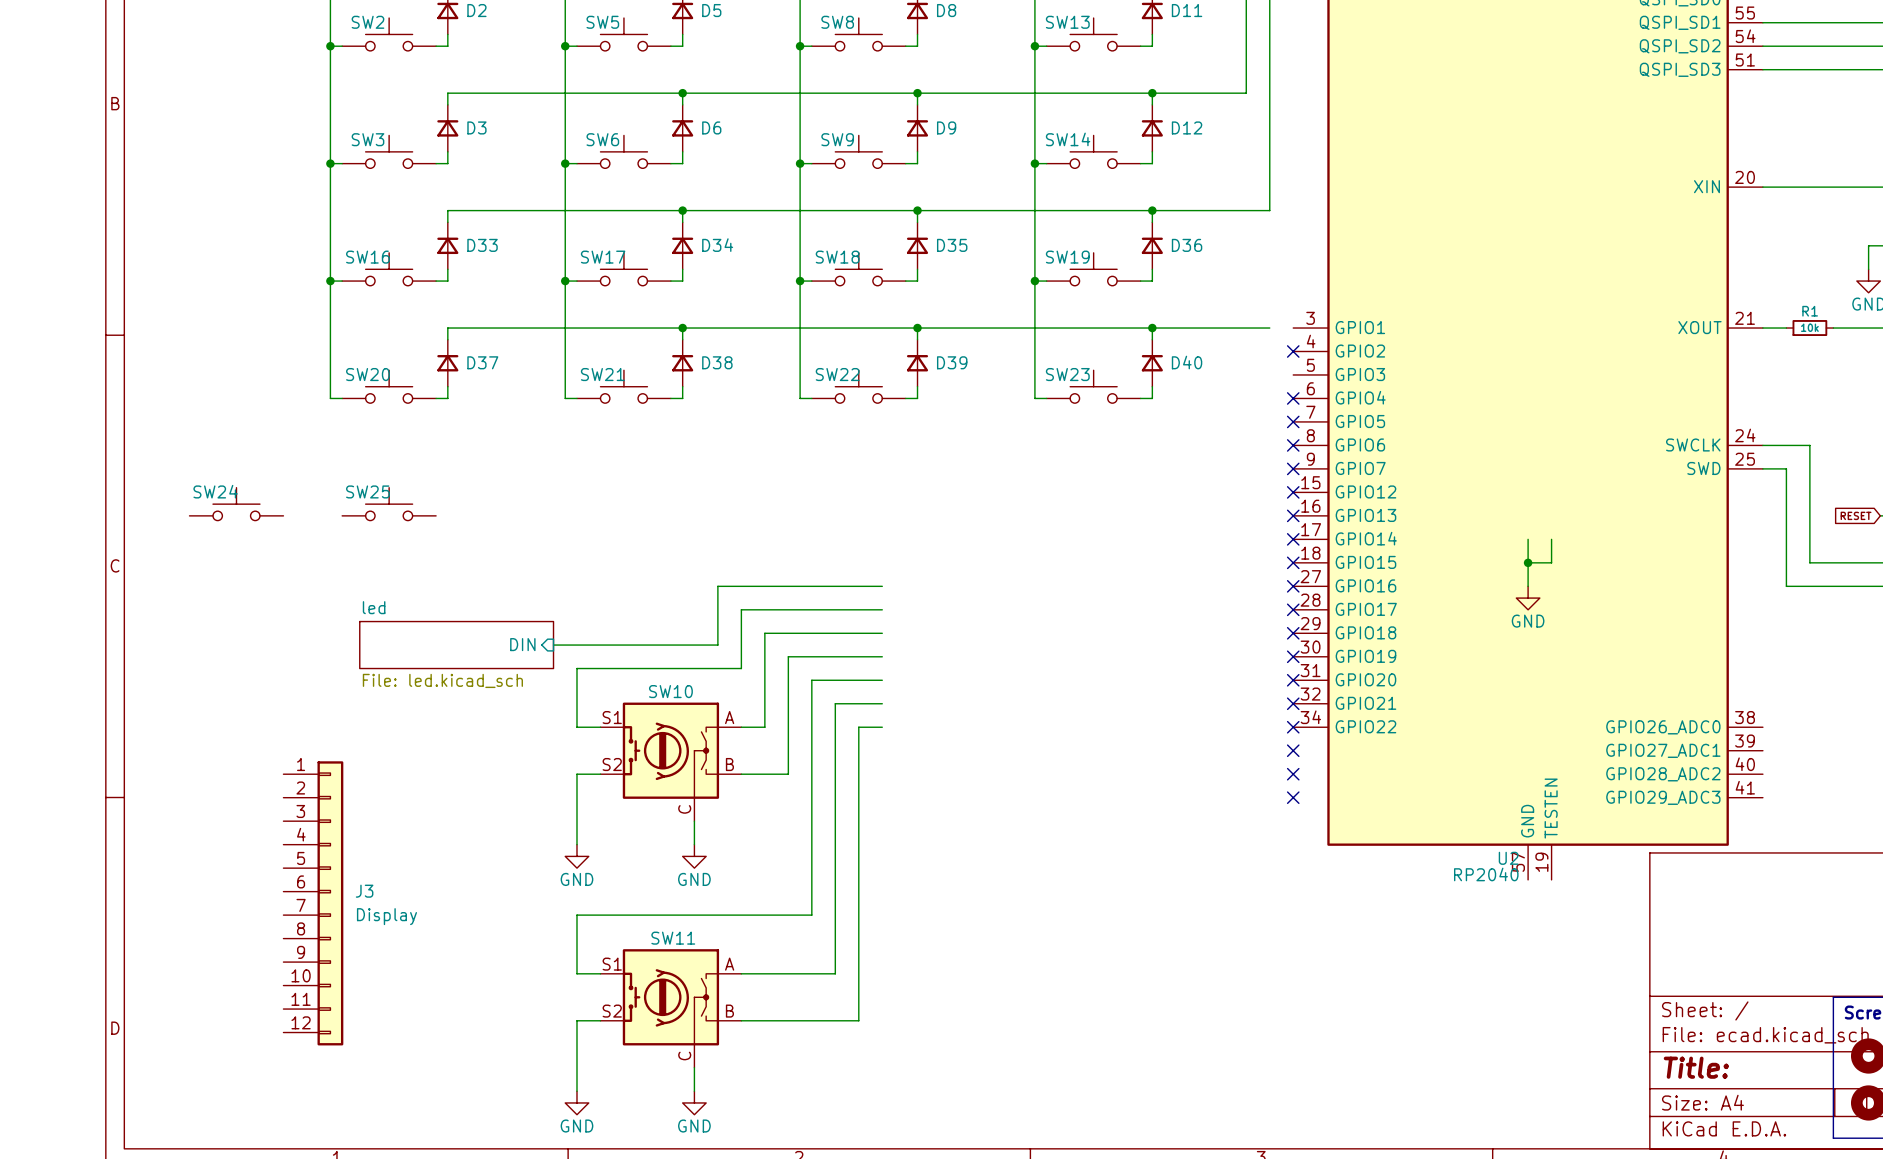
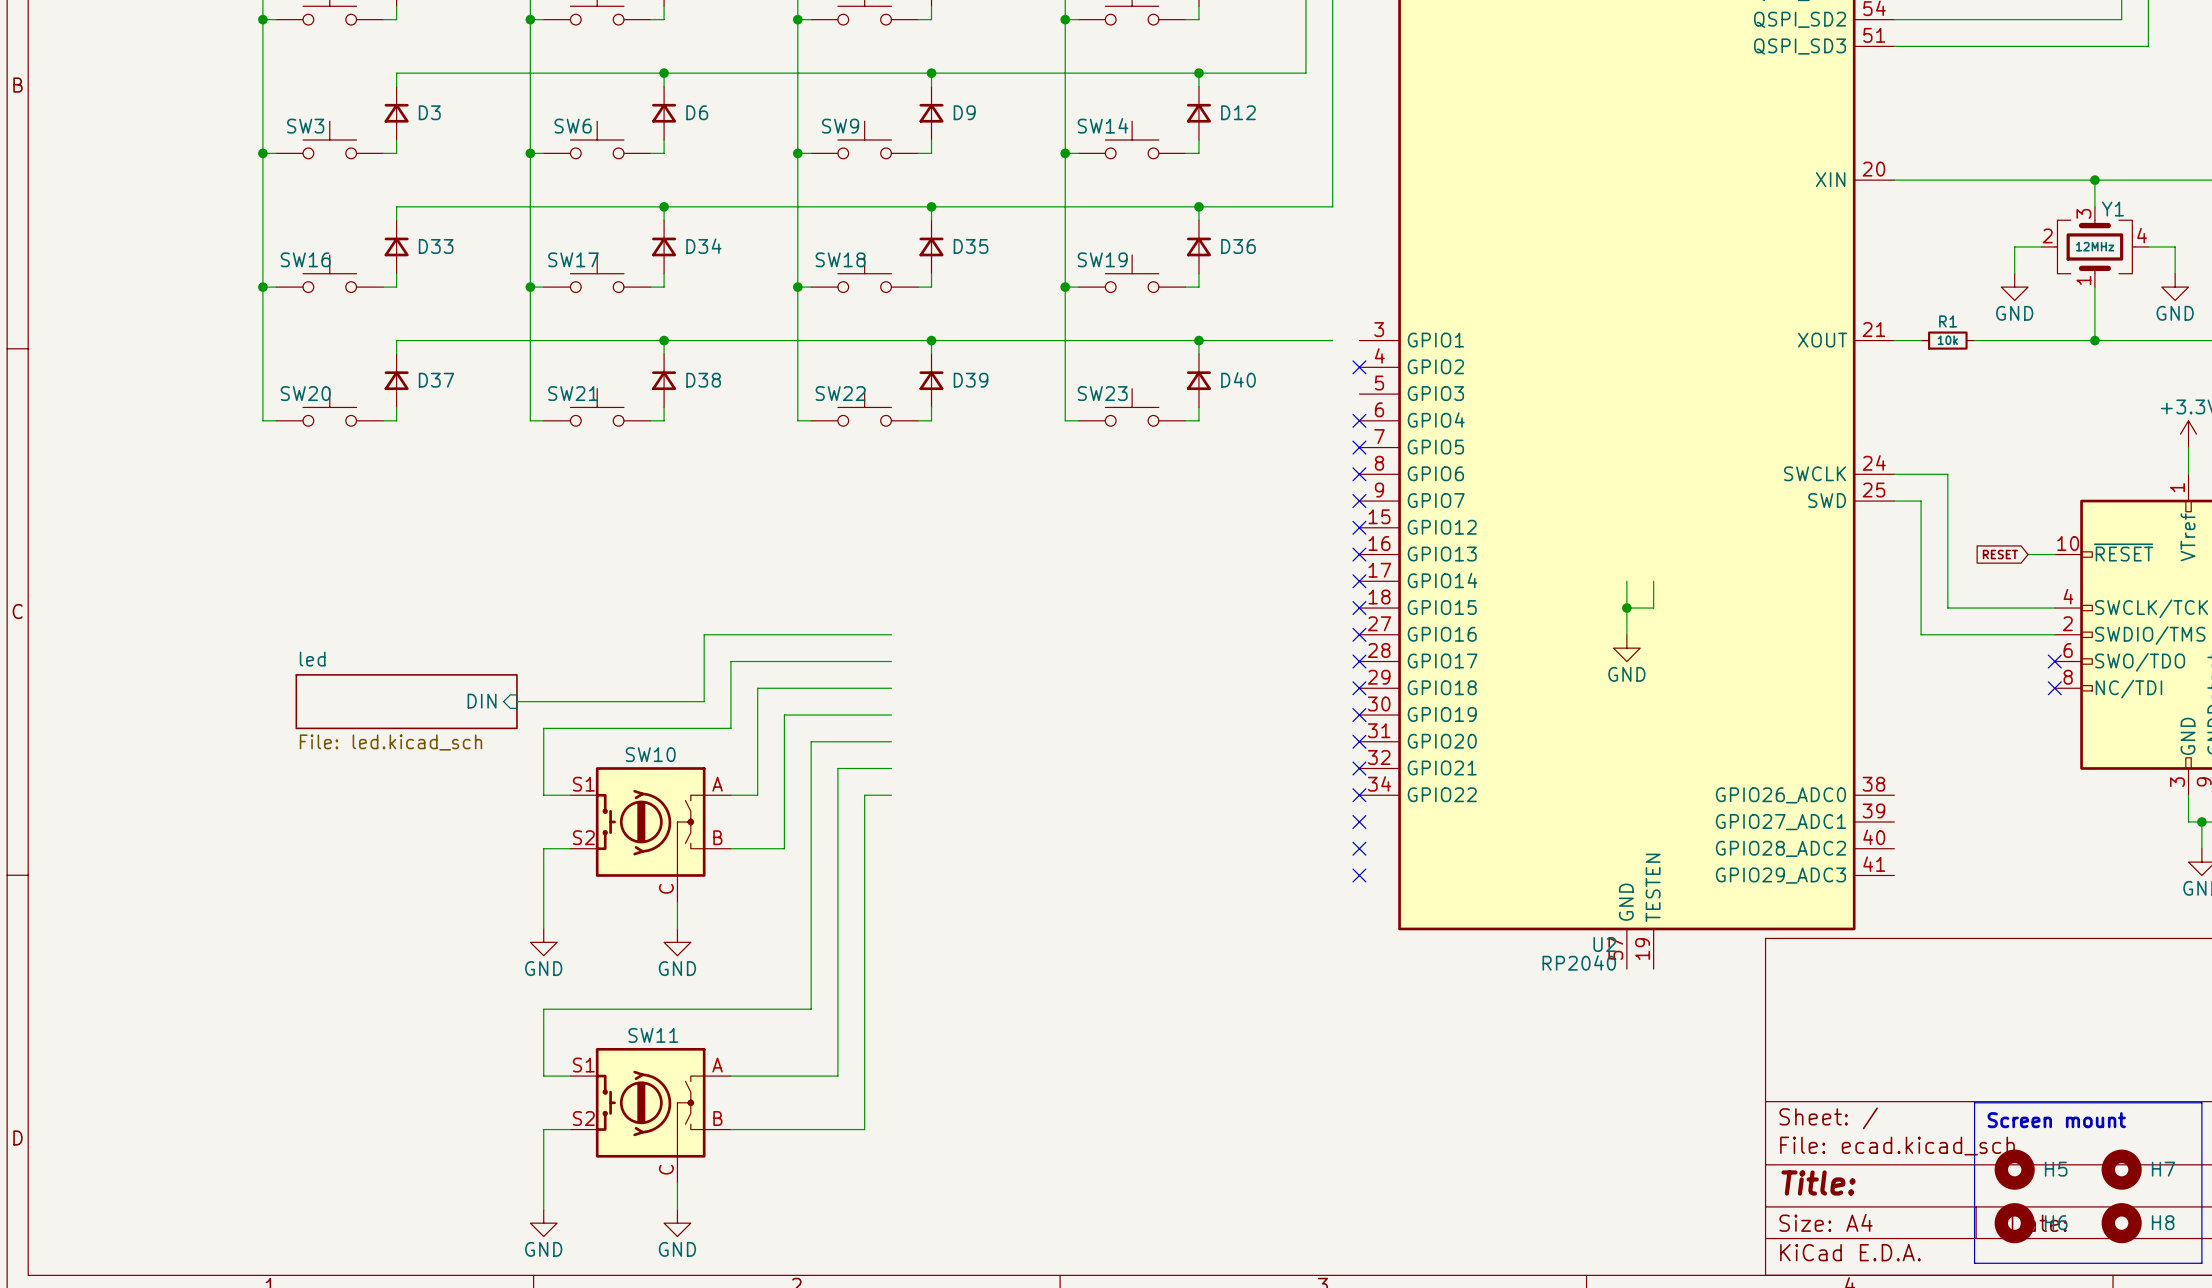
SW24: (236, 504) -> none
SW25: (389, 504) -> none
J3: Display (313, 903) -> none

